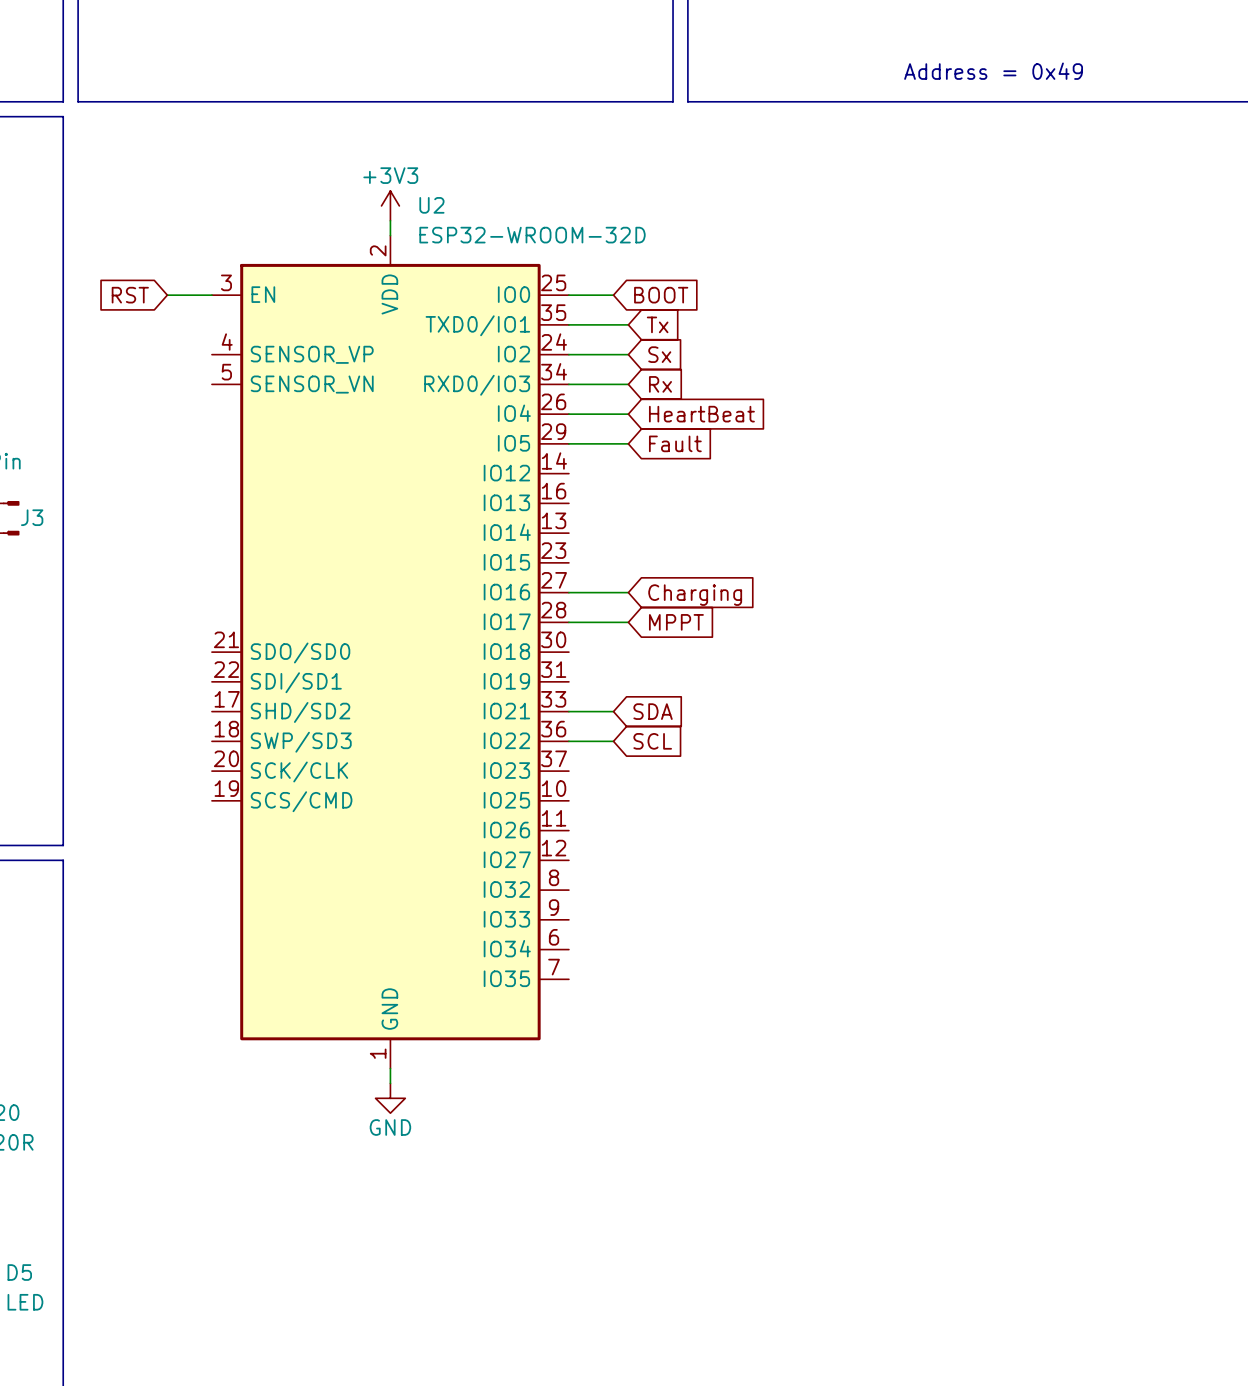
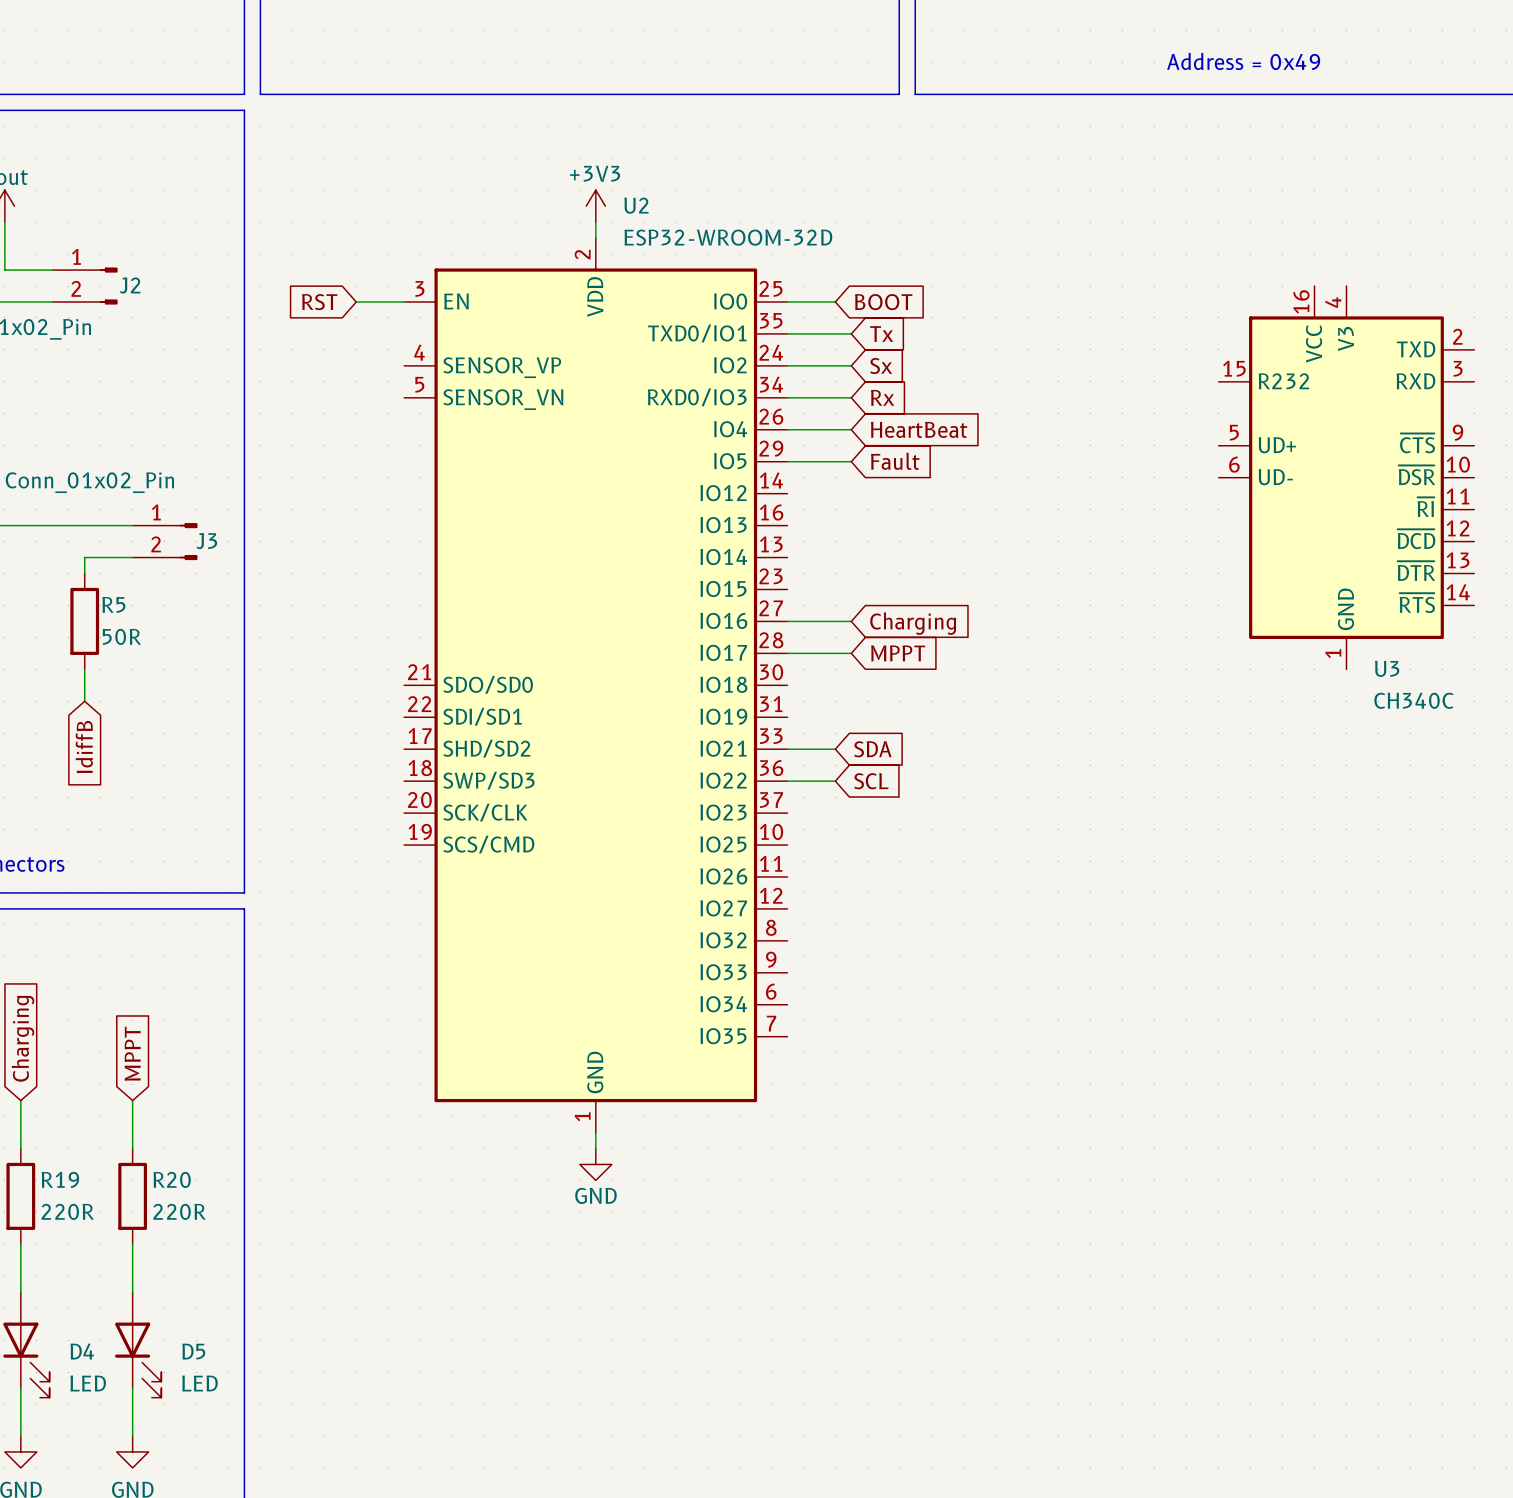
U3: none -> CH340C (1346, 477)

